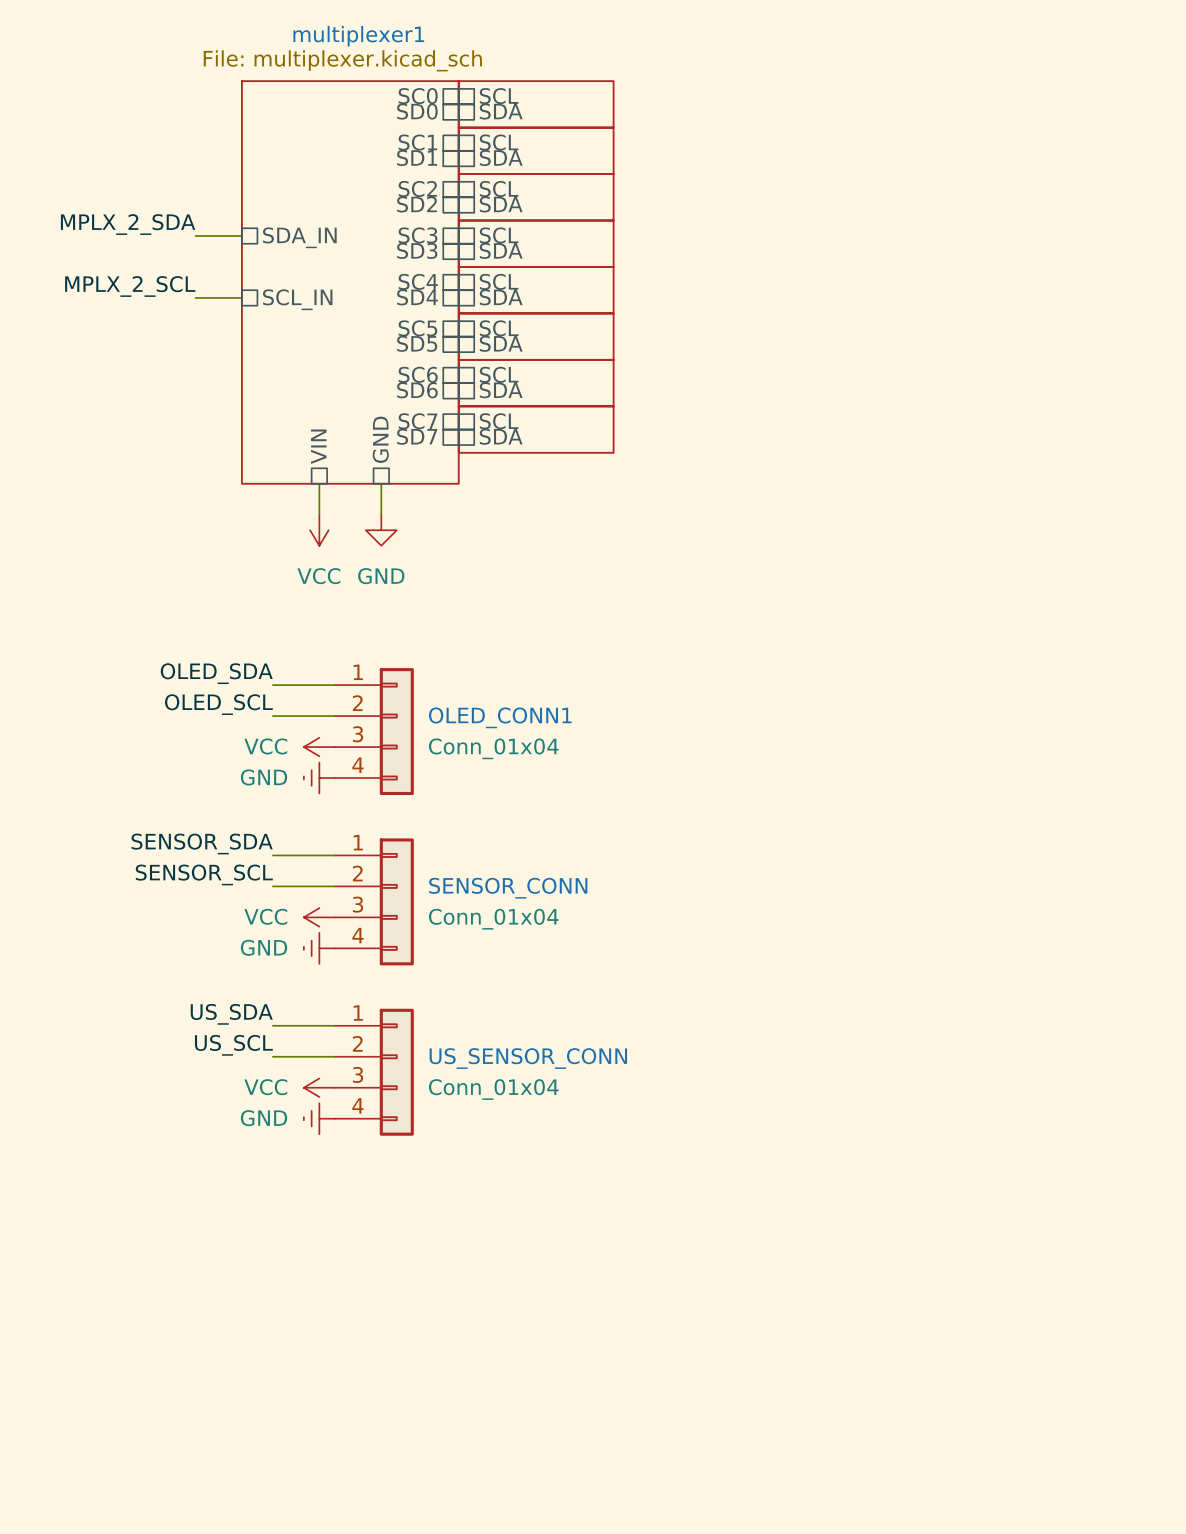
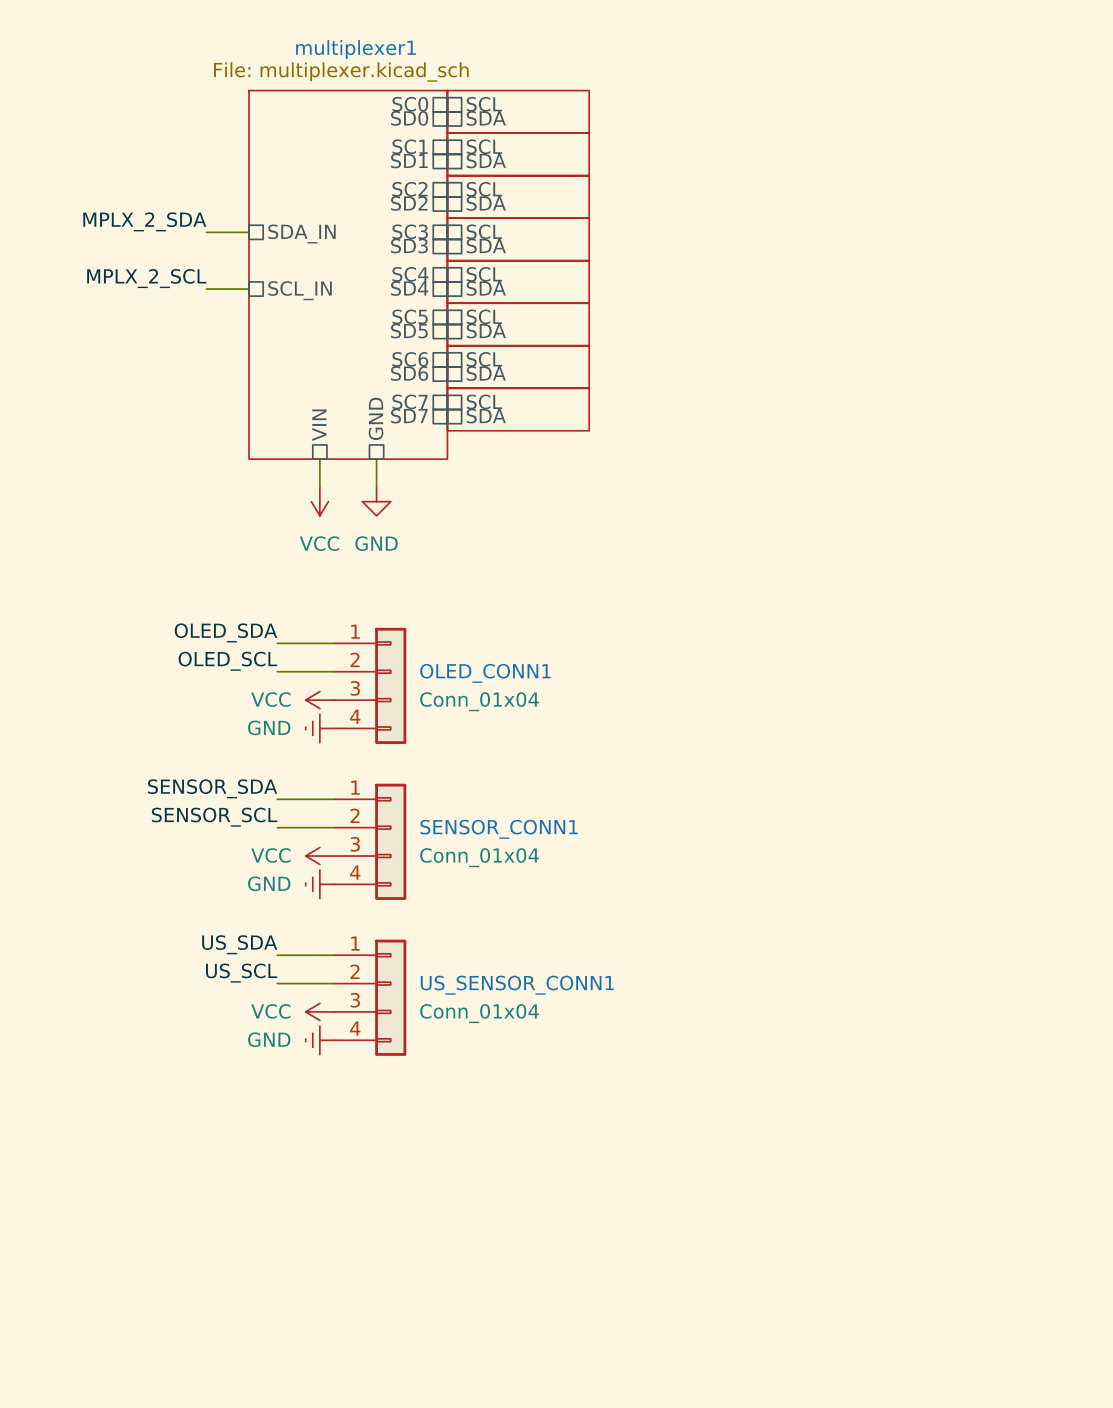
SENSOR_CONN name: SENSOR_CONN (508, 888) -> SENSOR_CONN1 (499, 829)
US_SENSOR_CONN name: US_SENSOR_CONN (528, 1058) -> US_SENSOR_CONN1 (517, 985)

